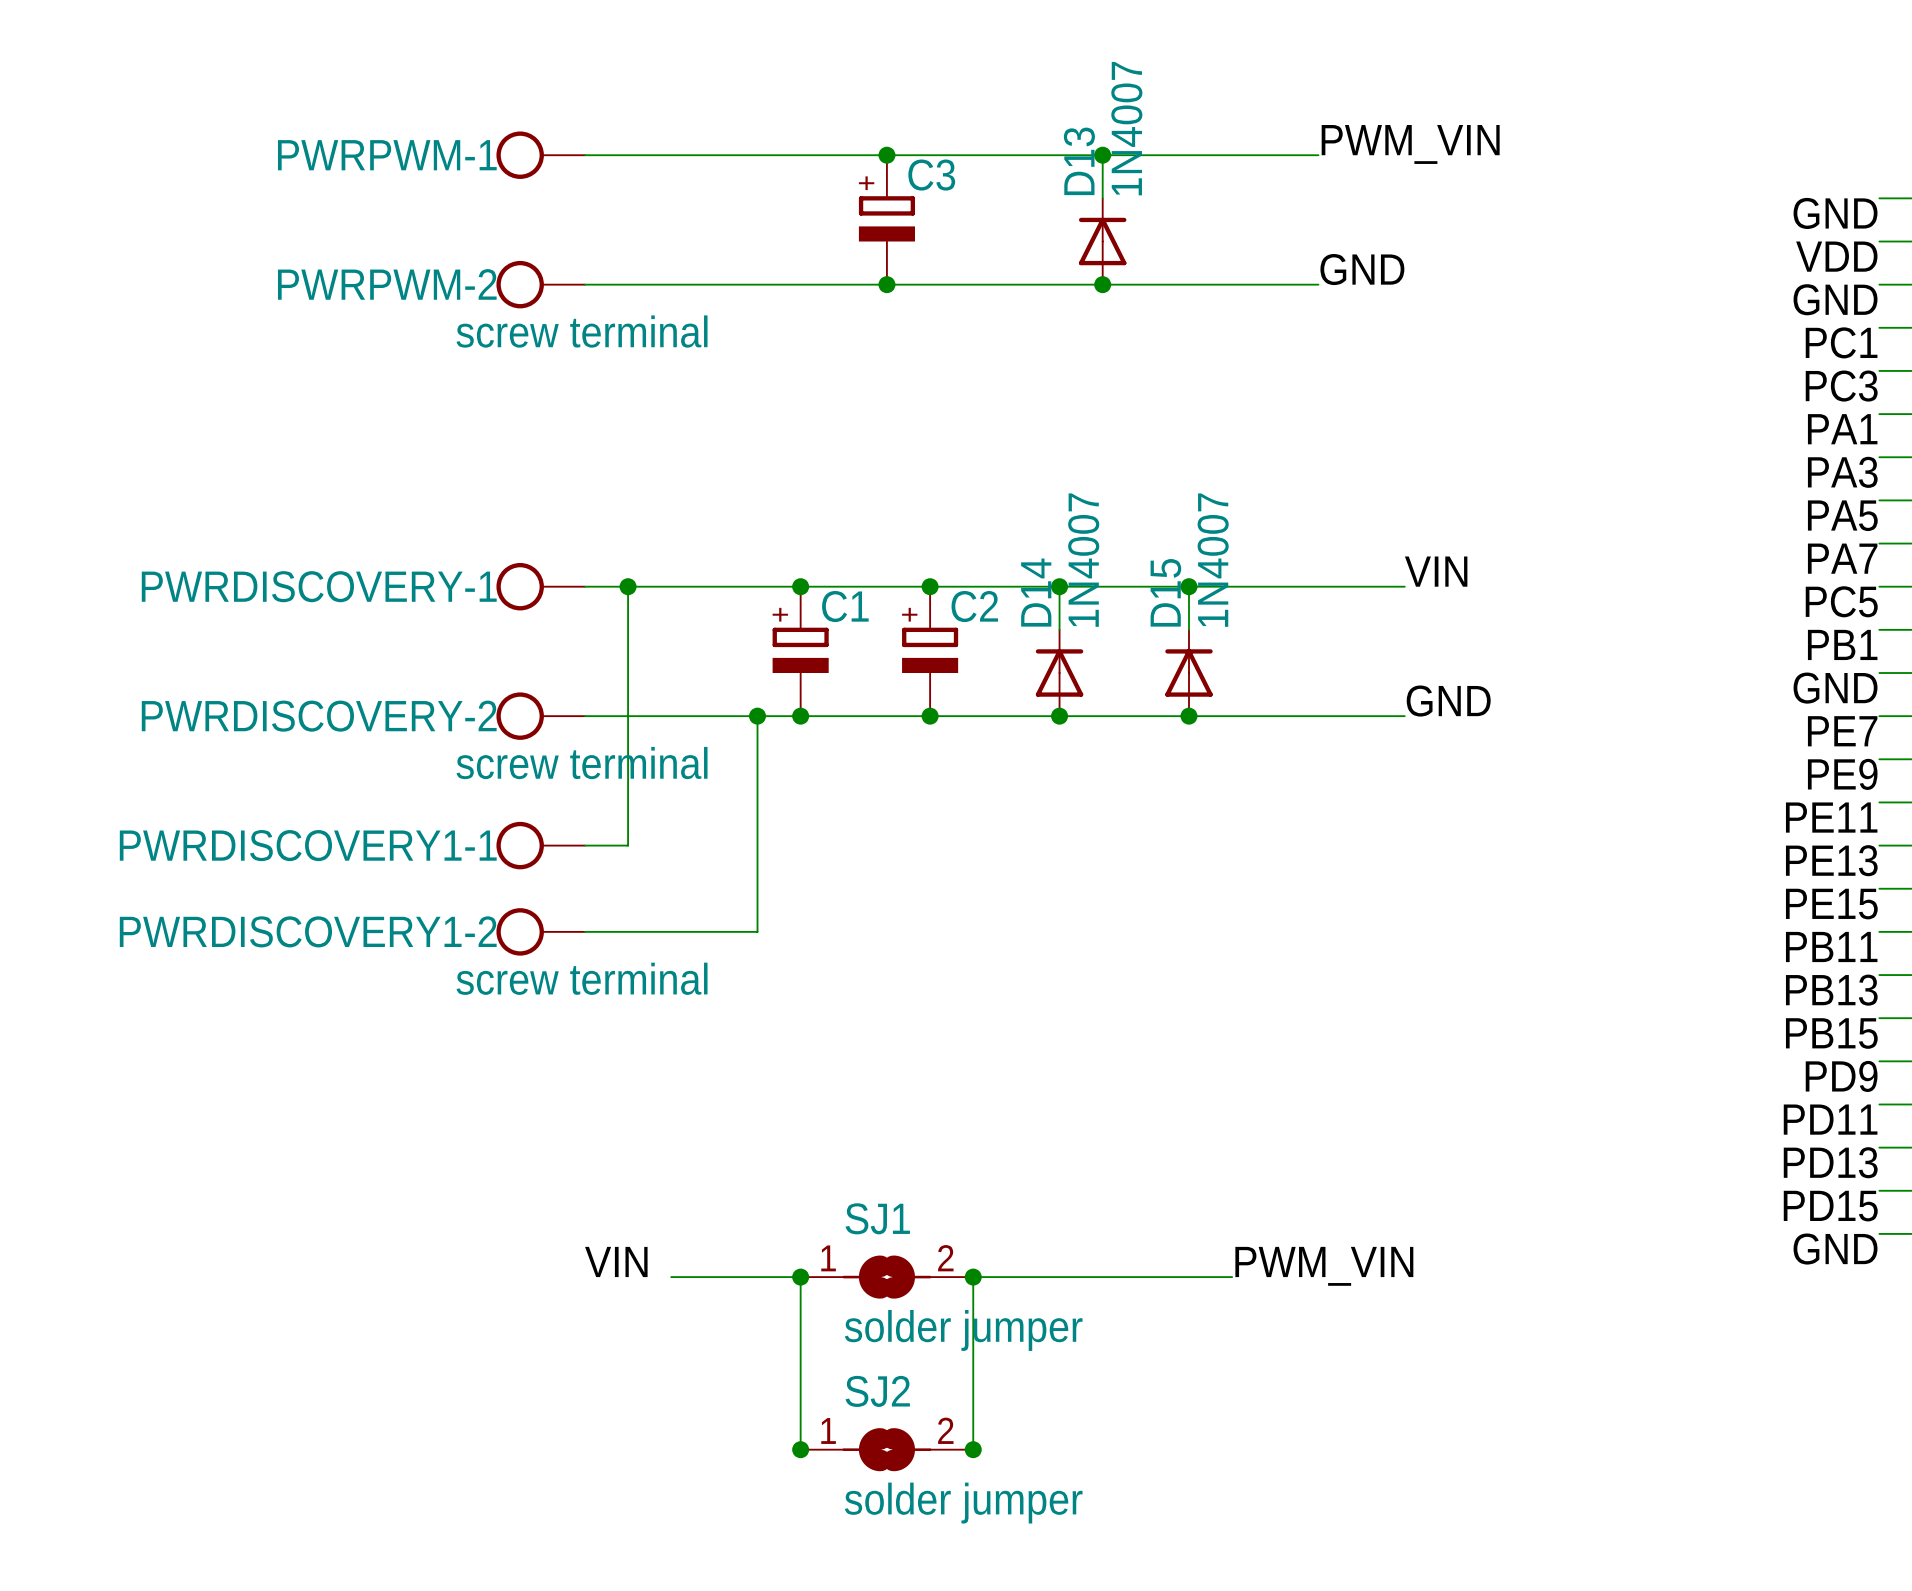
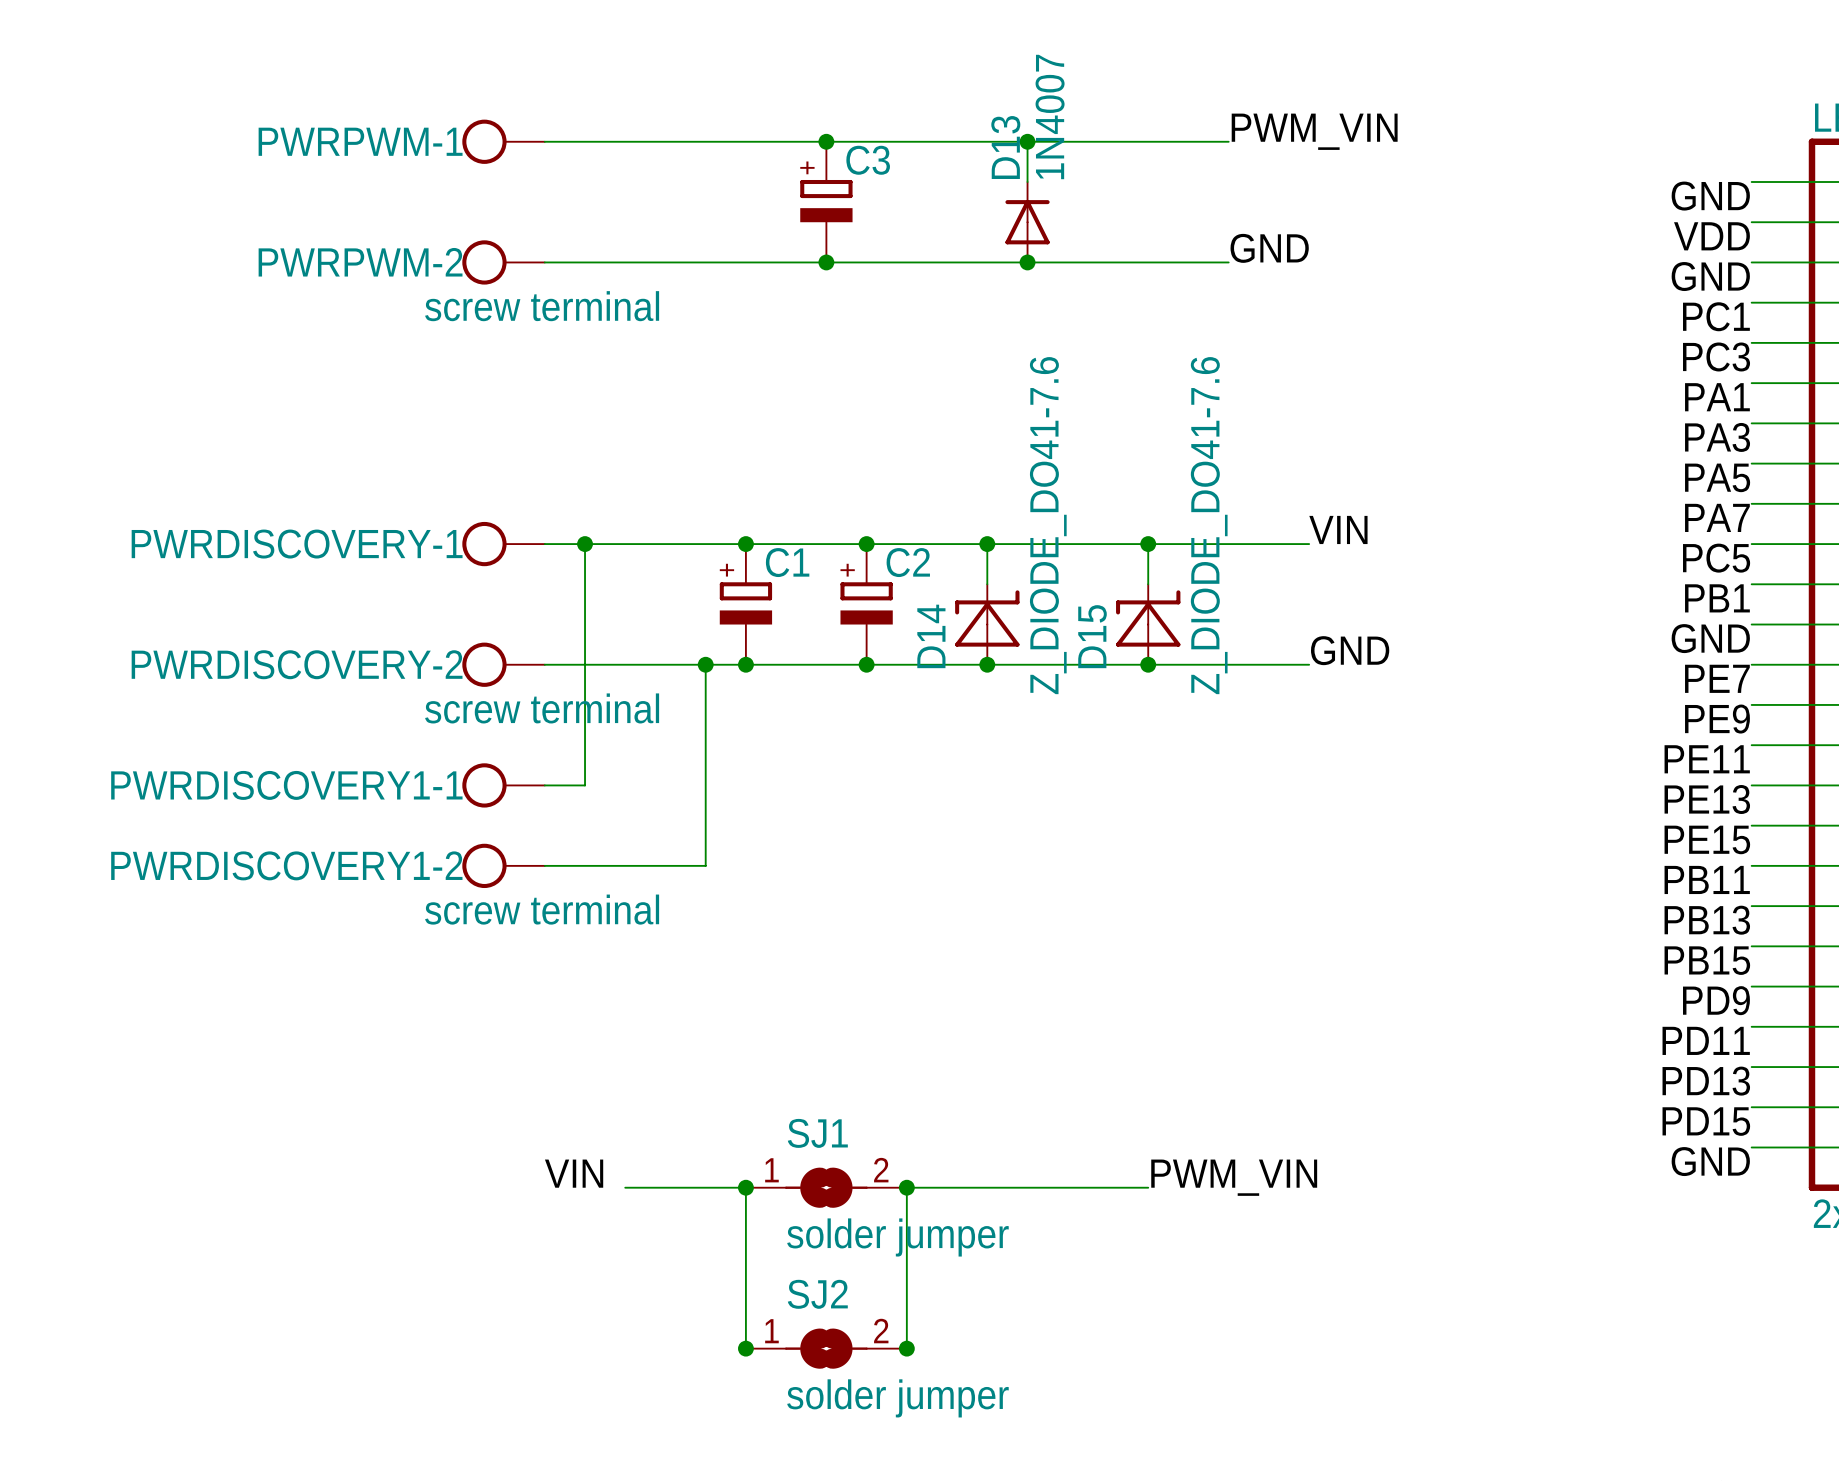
D14 value: 1N4007 (1083, 560) -> Z_DIODE_DO41-7.6 (1048, 525)
D15 value: 1N4007 (1213, 560) -> Z_DIODE_DO41-7.6 (1209, 525)
wire: (1188, 586) (1188, 629) -> (1148, 544) (1148, 584)
junction position: (1188, 586) -> (1148, 544)
D14 name position: D14 (1036, 592) -> D14 (931, 636)
D15 name position: D15 (1165, 592) -> D15 (1092, 636)
D14 symbol: [1035, 629, 1084, 717] -> [955, 584, 1020, 665]
D15 symbol: [1165, 629, 1213, 717] -> [1116, 584, 1181, 665]
junction position: (1188, 716) -> (1148, 664)

